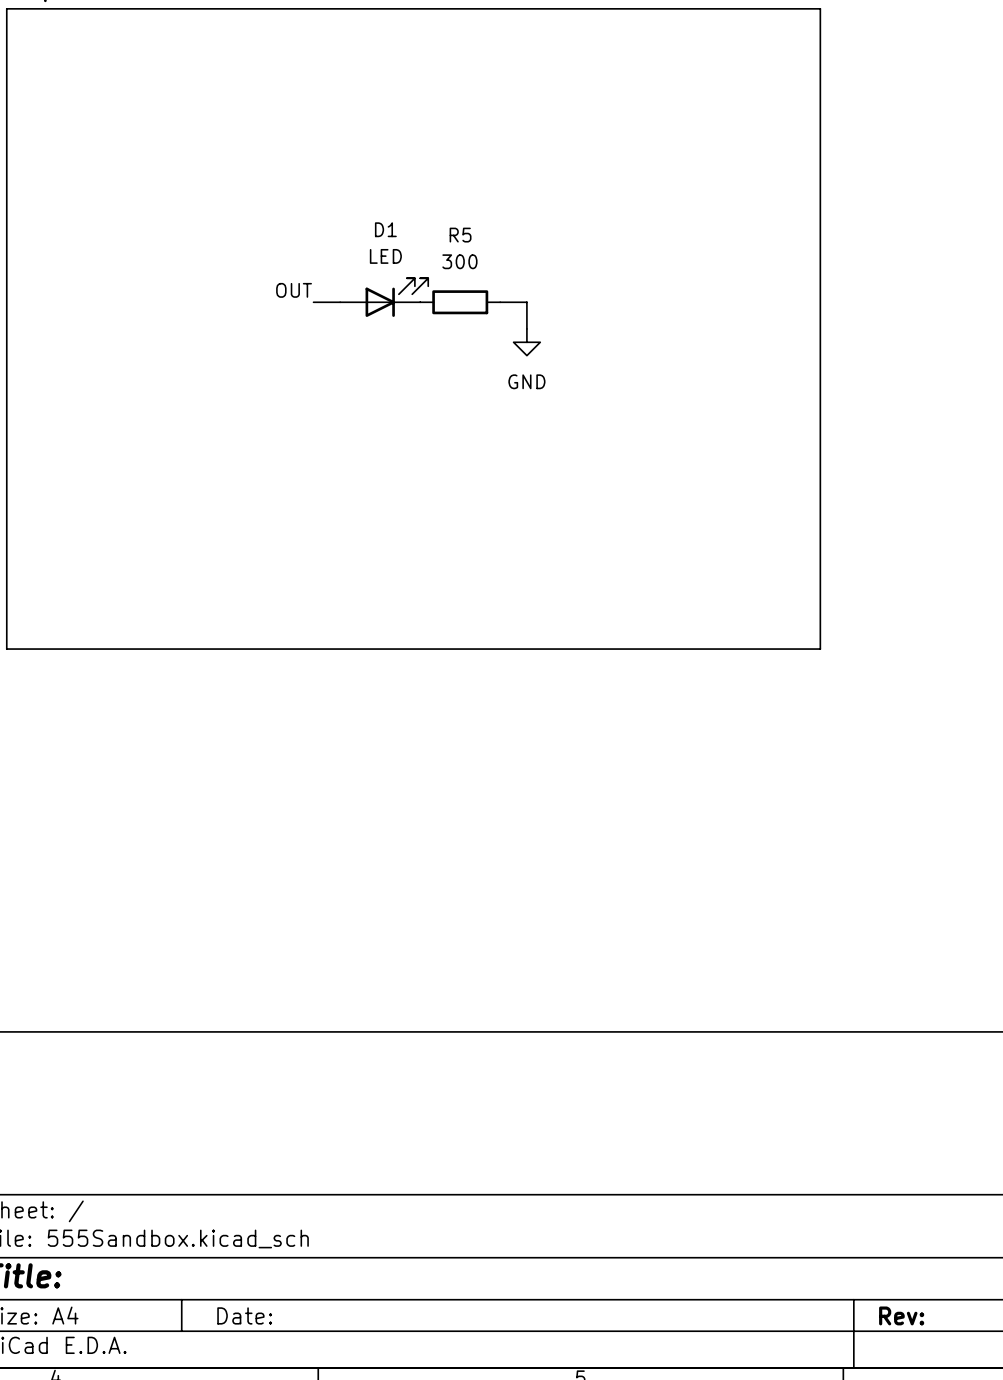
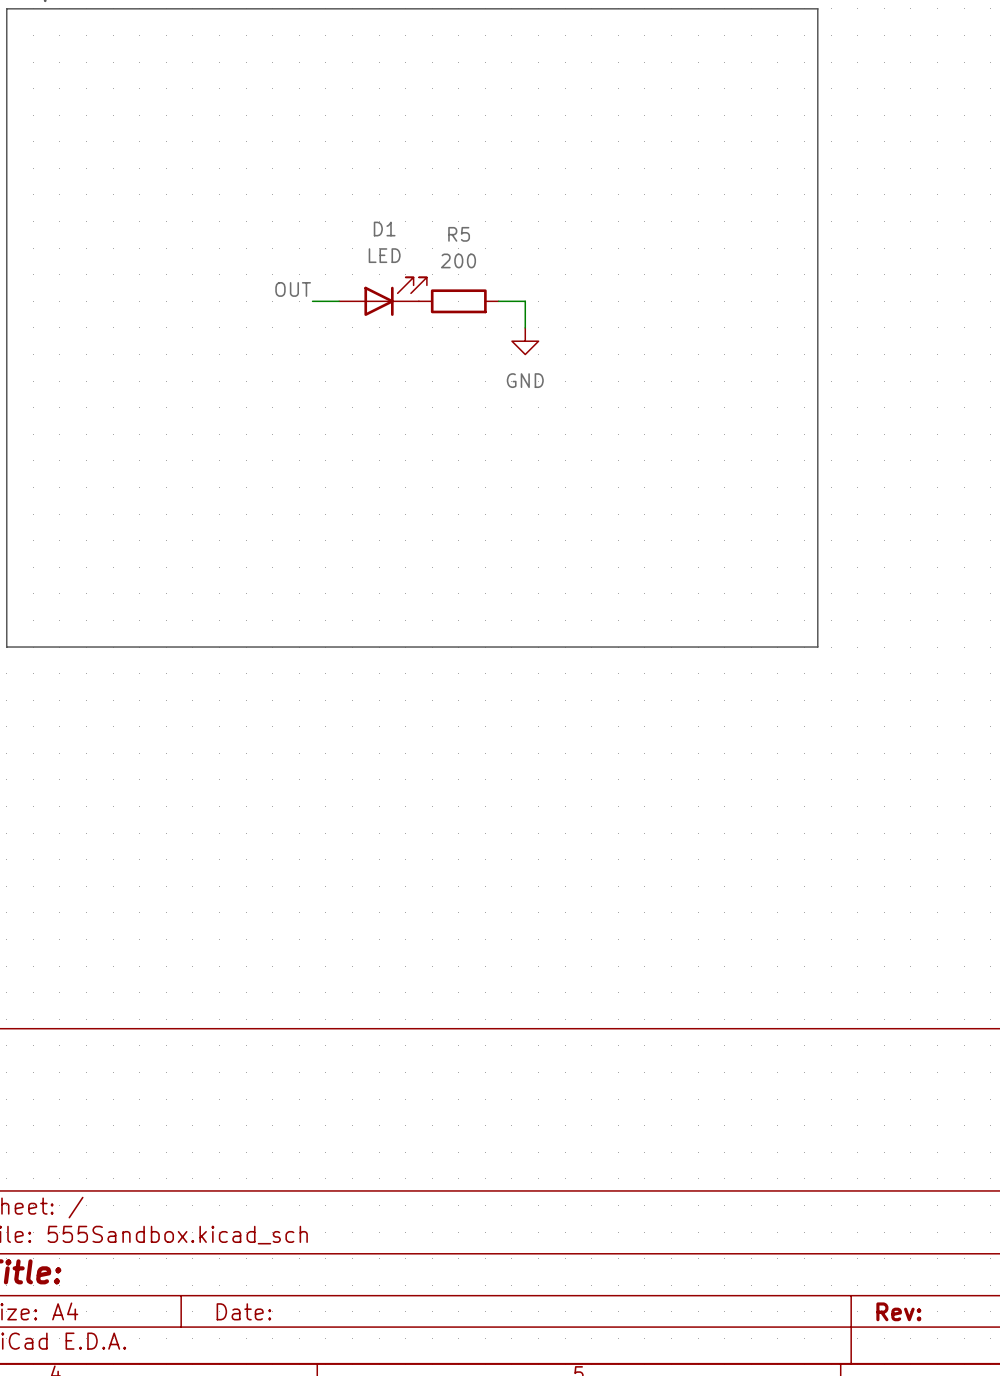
R5 value: 300 (459, 261) -> 200 (458, 260)

